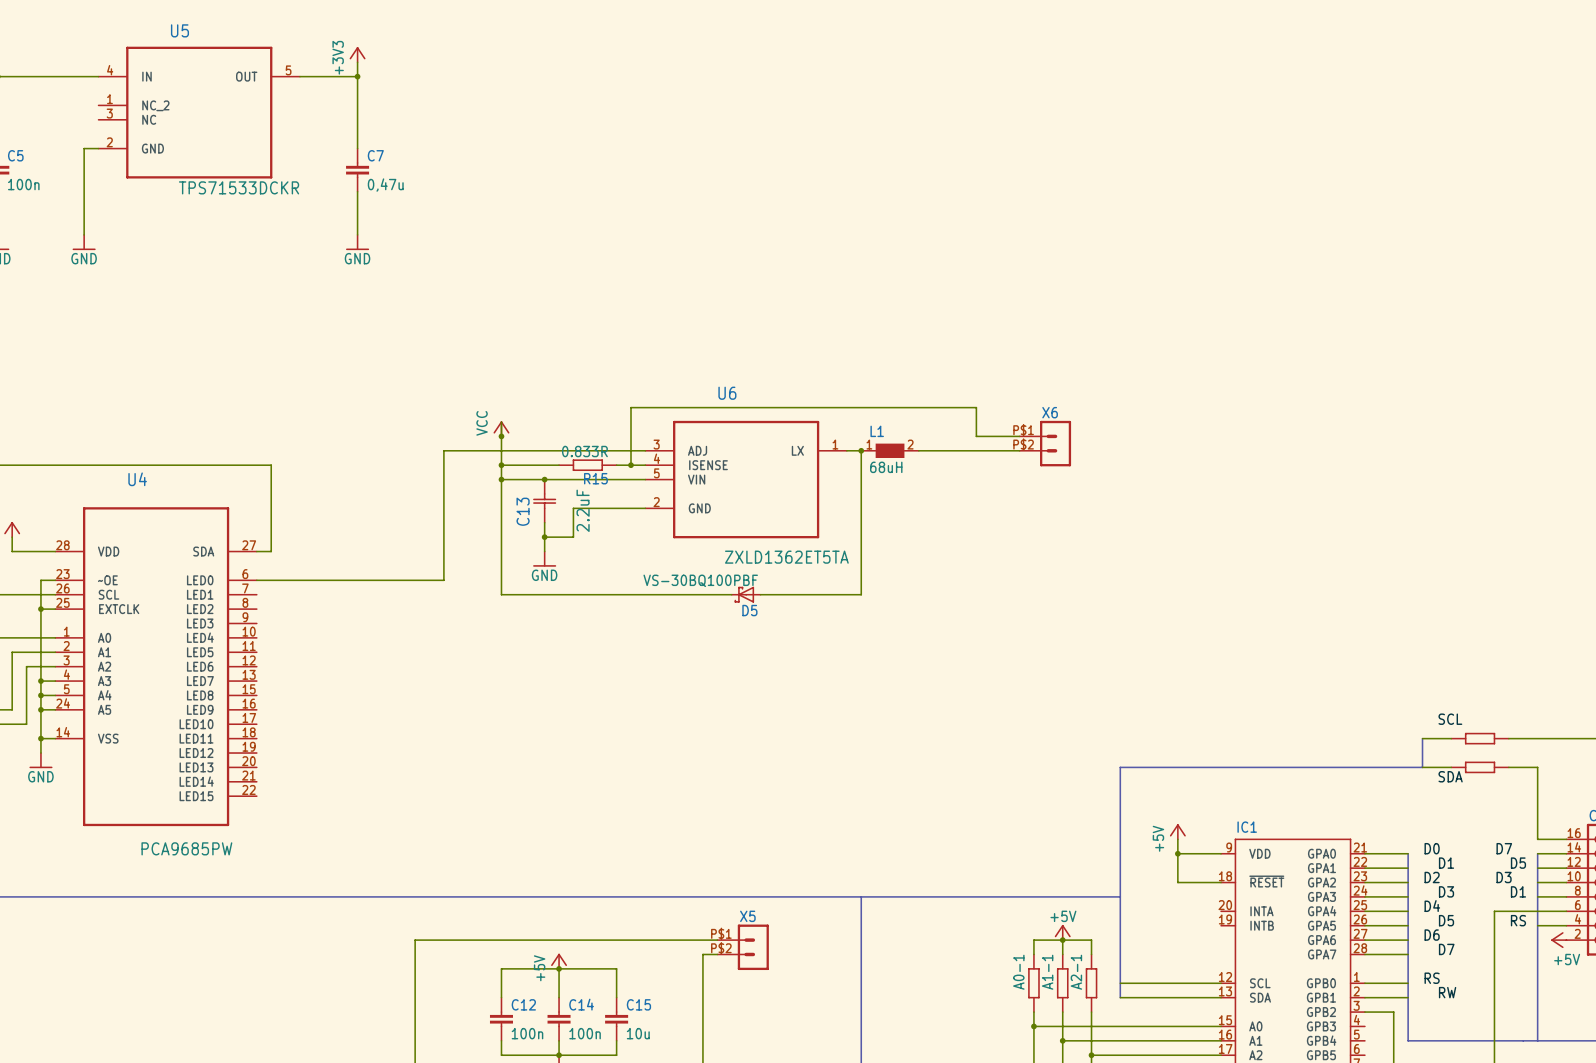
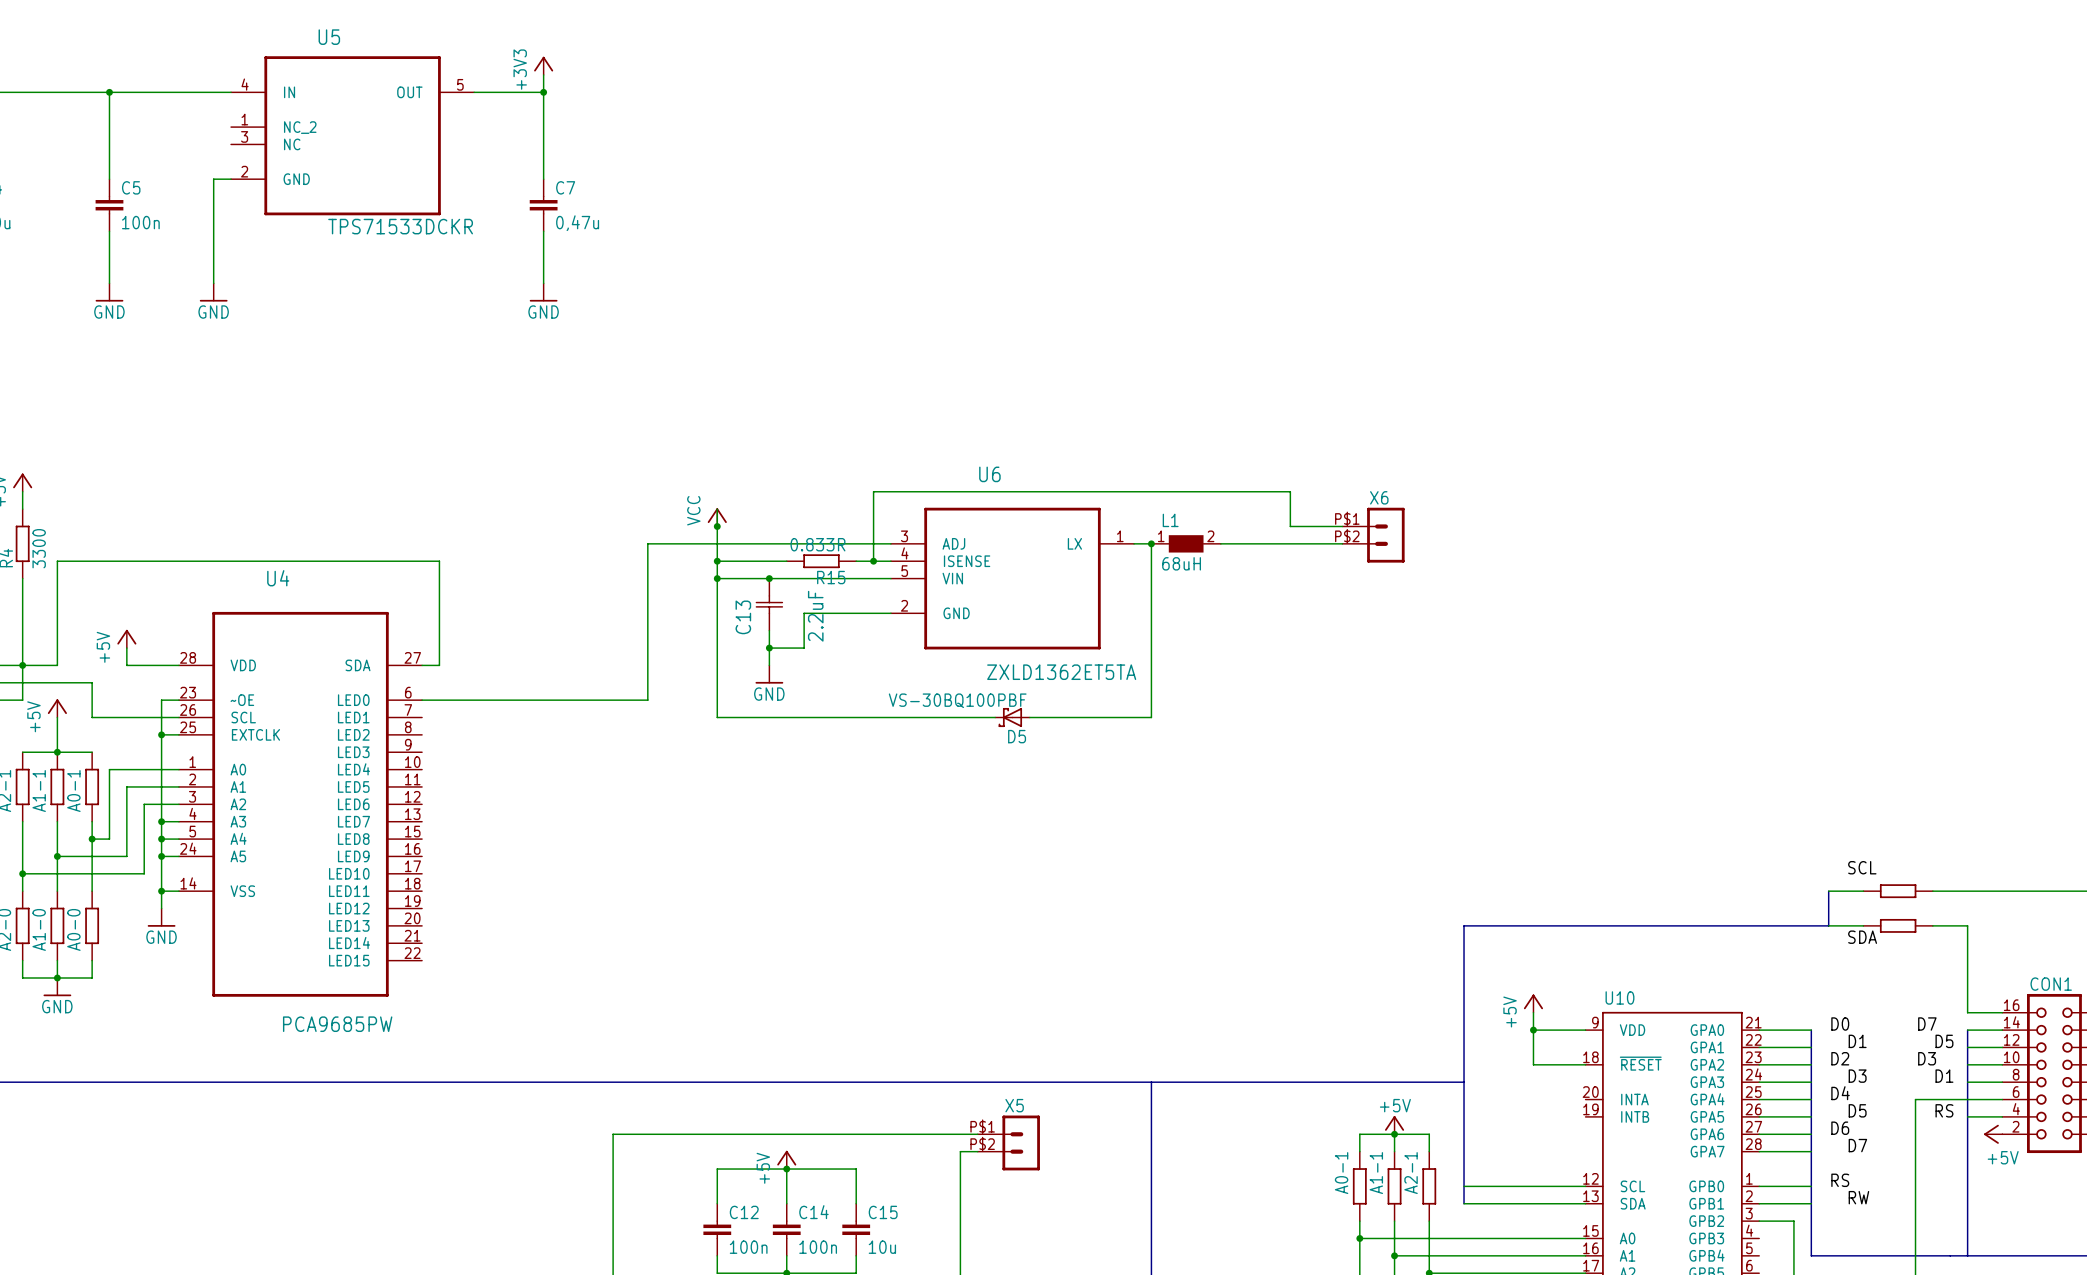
IC1 name: IC1 (1247, 827) -> U10 (1619, 997)

